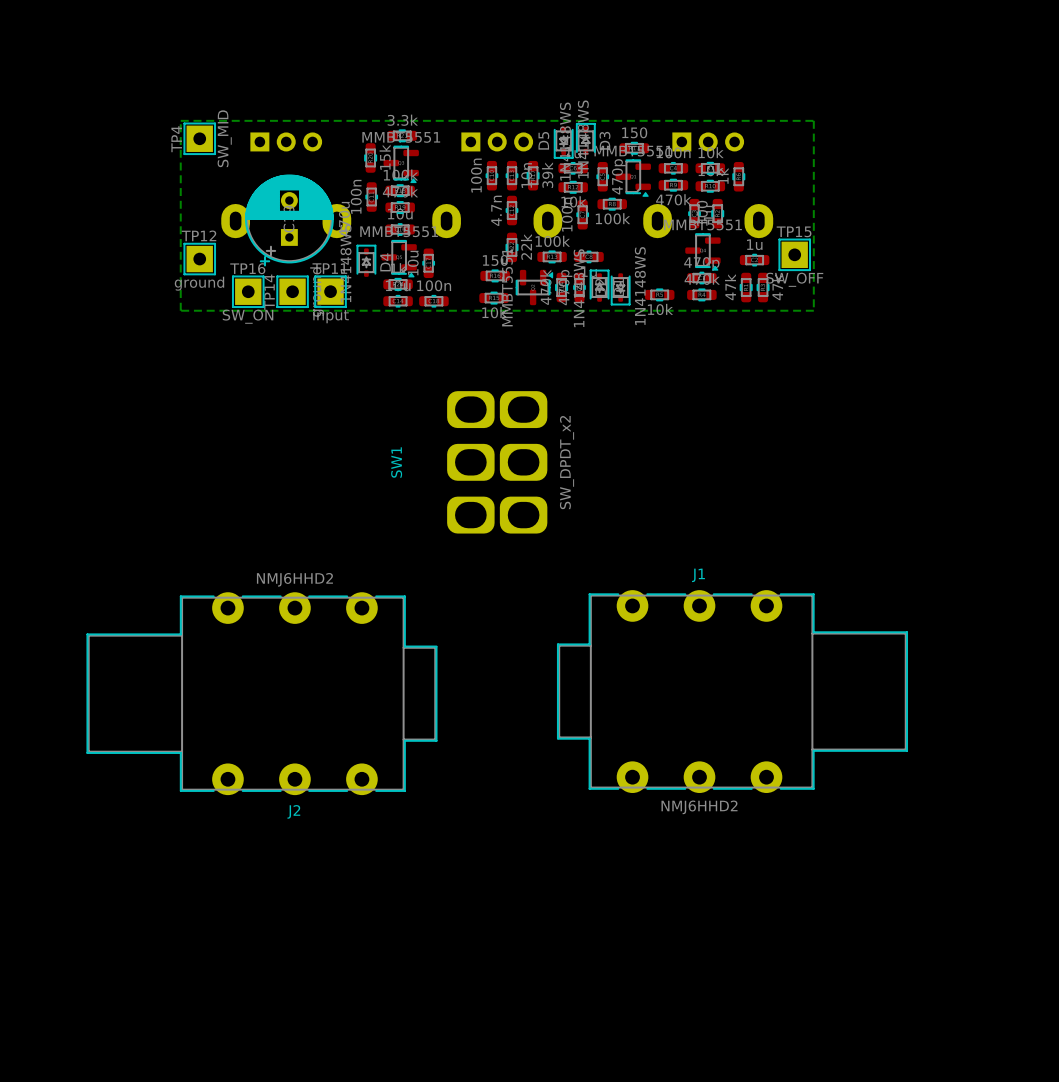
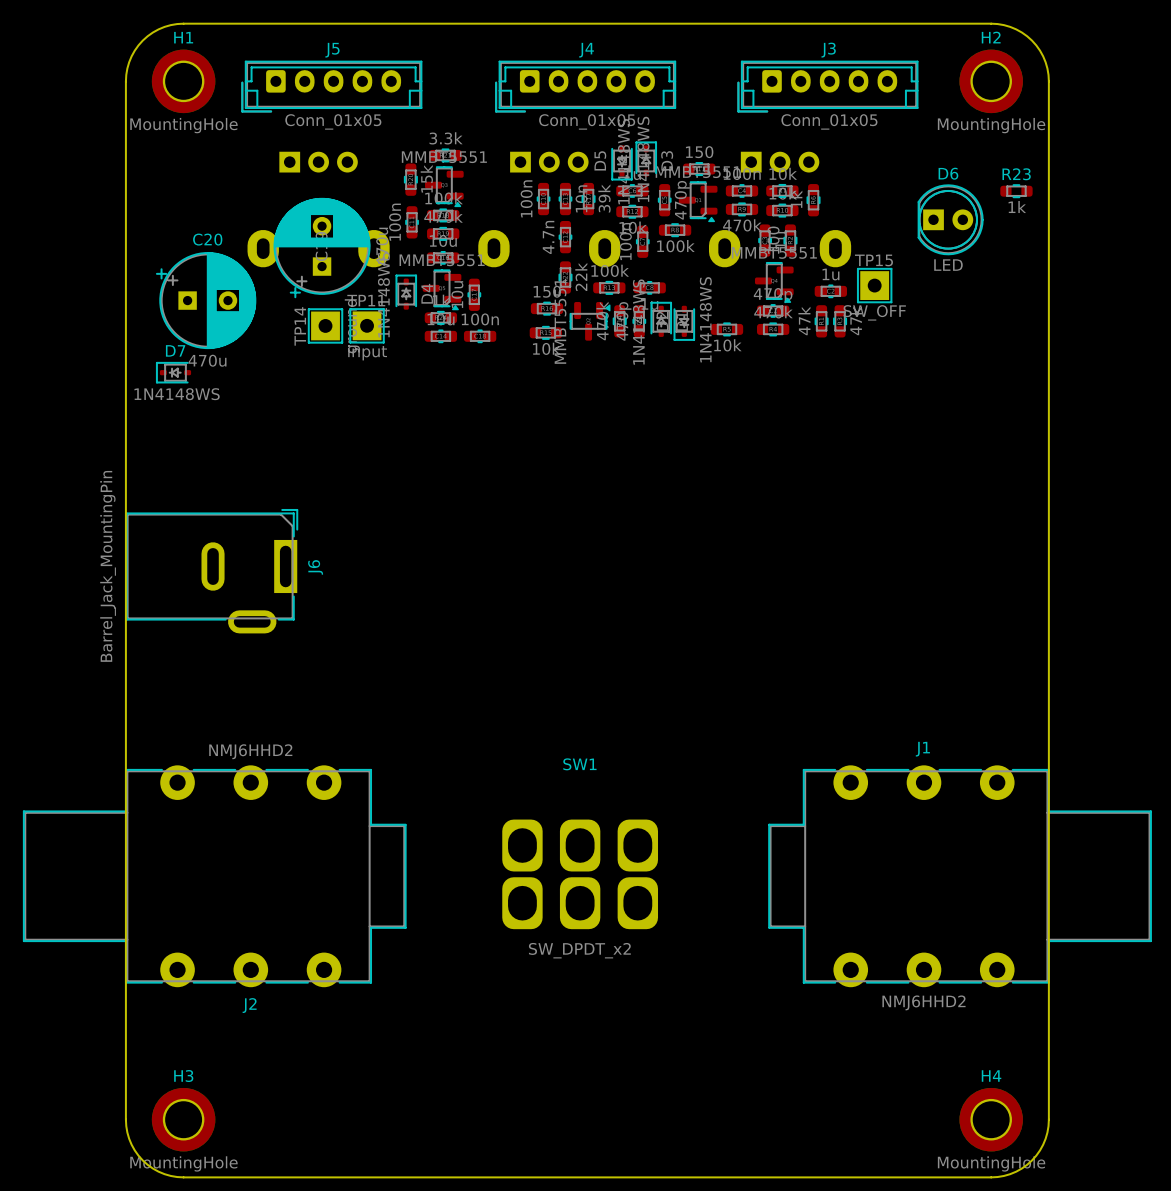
board edge: none -> (183, 23) (991, 23) (1016, 29) (1036, 45) (1045, 62) (1048, 81) (1048, 1119) (1043, 1144) (1027, 1164) (1010, 1174) (991, 1177) (183, 1177) (158, 1171) (138, 1155) (129, 1138) (125, 1119) (125, 81) (129, 62) (142, 40) (164, 26) (183, 23)
H1: none -> MountingHole (183, 81)
H2: none -> MountingHole (991, 81)
J5: none -> Conn_01x05 (331, 86)
J4: none -> Conn_01x05 (585, 86)
J3: none -> Conn_01x05 (827, 86)
bottom zone outline: (180, 120) (813, 120) (813, 310) (180, 310) (180, 120) -> none
TP4: SW_MID (199, 138) -> none
R23: none -> 1k (1016, 191)
D6: none -> LED (950, 219)
TP12: ground (199, 259) -> none
C20: none -> 470u (206, 300)
TP16: SW_ON (248, 291) -> none
D7: none -> 1N4148WS (173, 372)
SW1 rotation: 0° (497, 462) -> 90° clockwise (580, 874)
SW1 position: (497, 462) -> (580, 874)
J6: none -> Barrel_Jack_MountingPin (211, 571)
J1 position: (732, 691) -> (960, 876)
J2 position: (261, 693) -> (214, 876)
H3: none -> MountingHole (183, 1119)
H4: none -> MountingHole (991, 1119)

